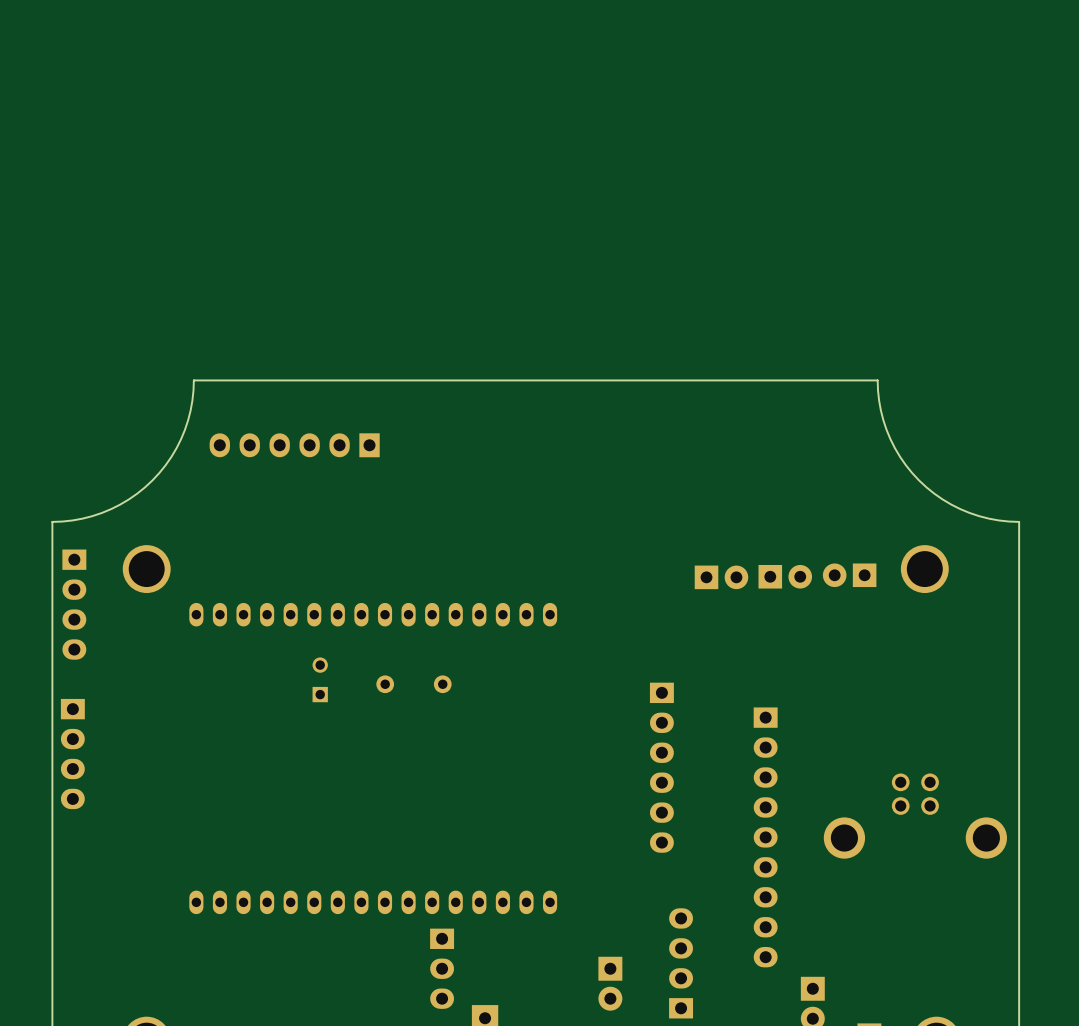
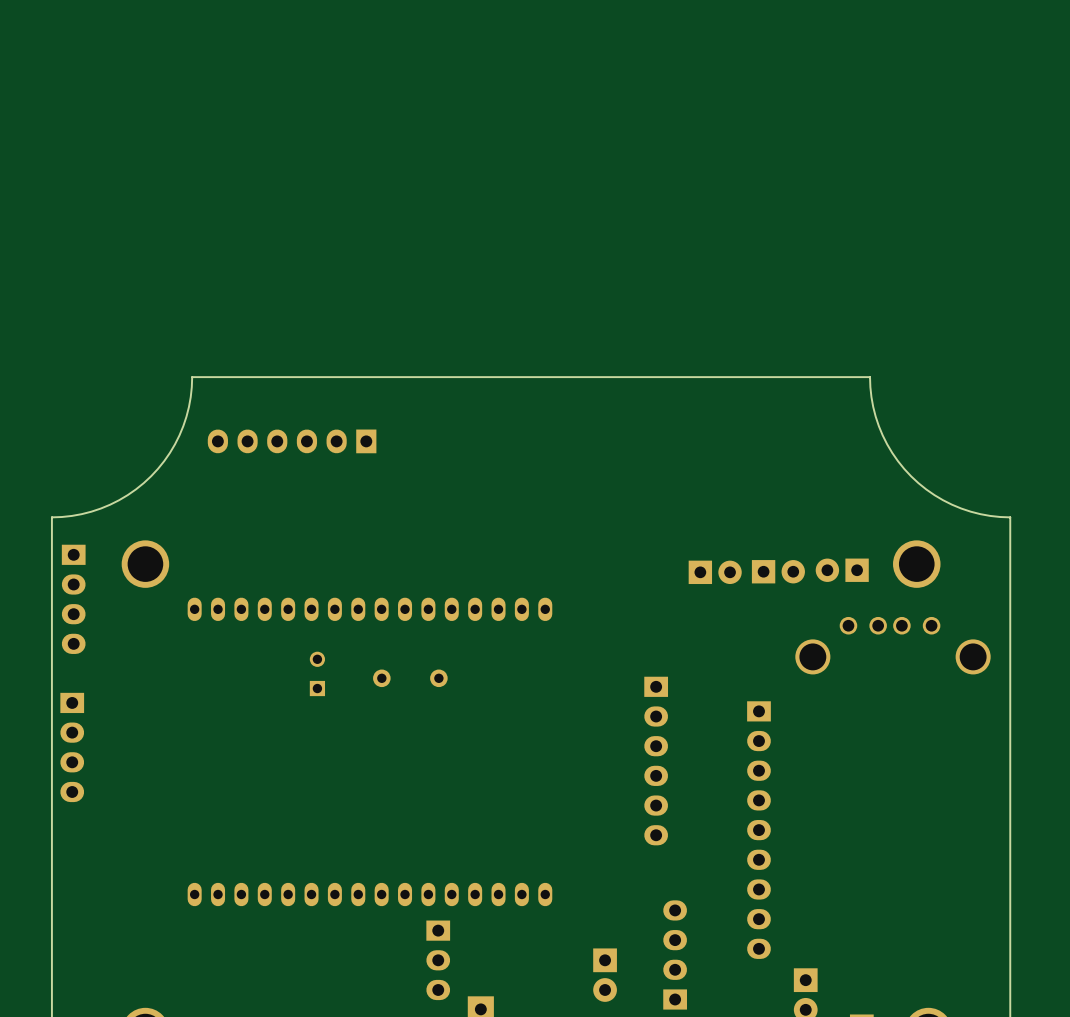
part: none -> (893, 645)
part: (915, 816) -> none

